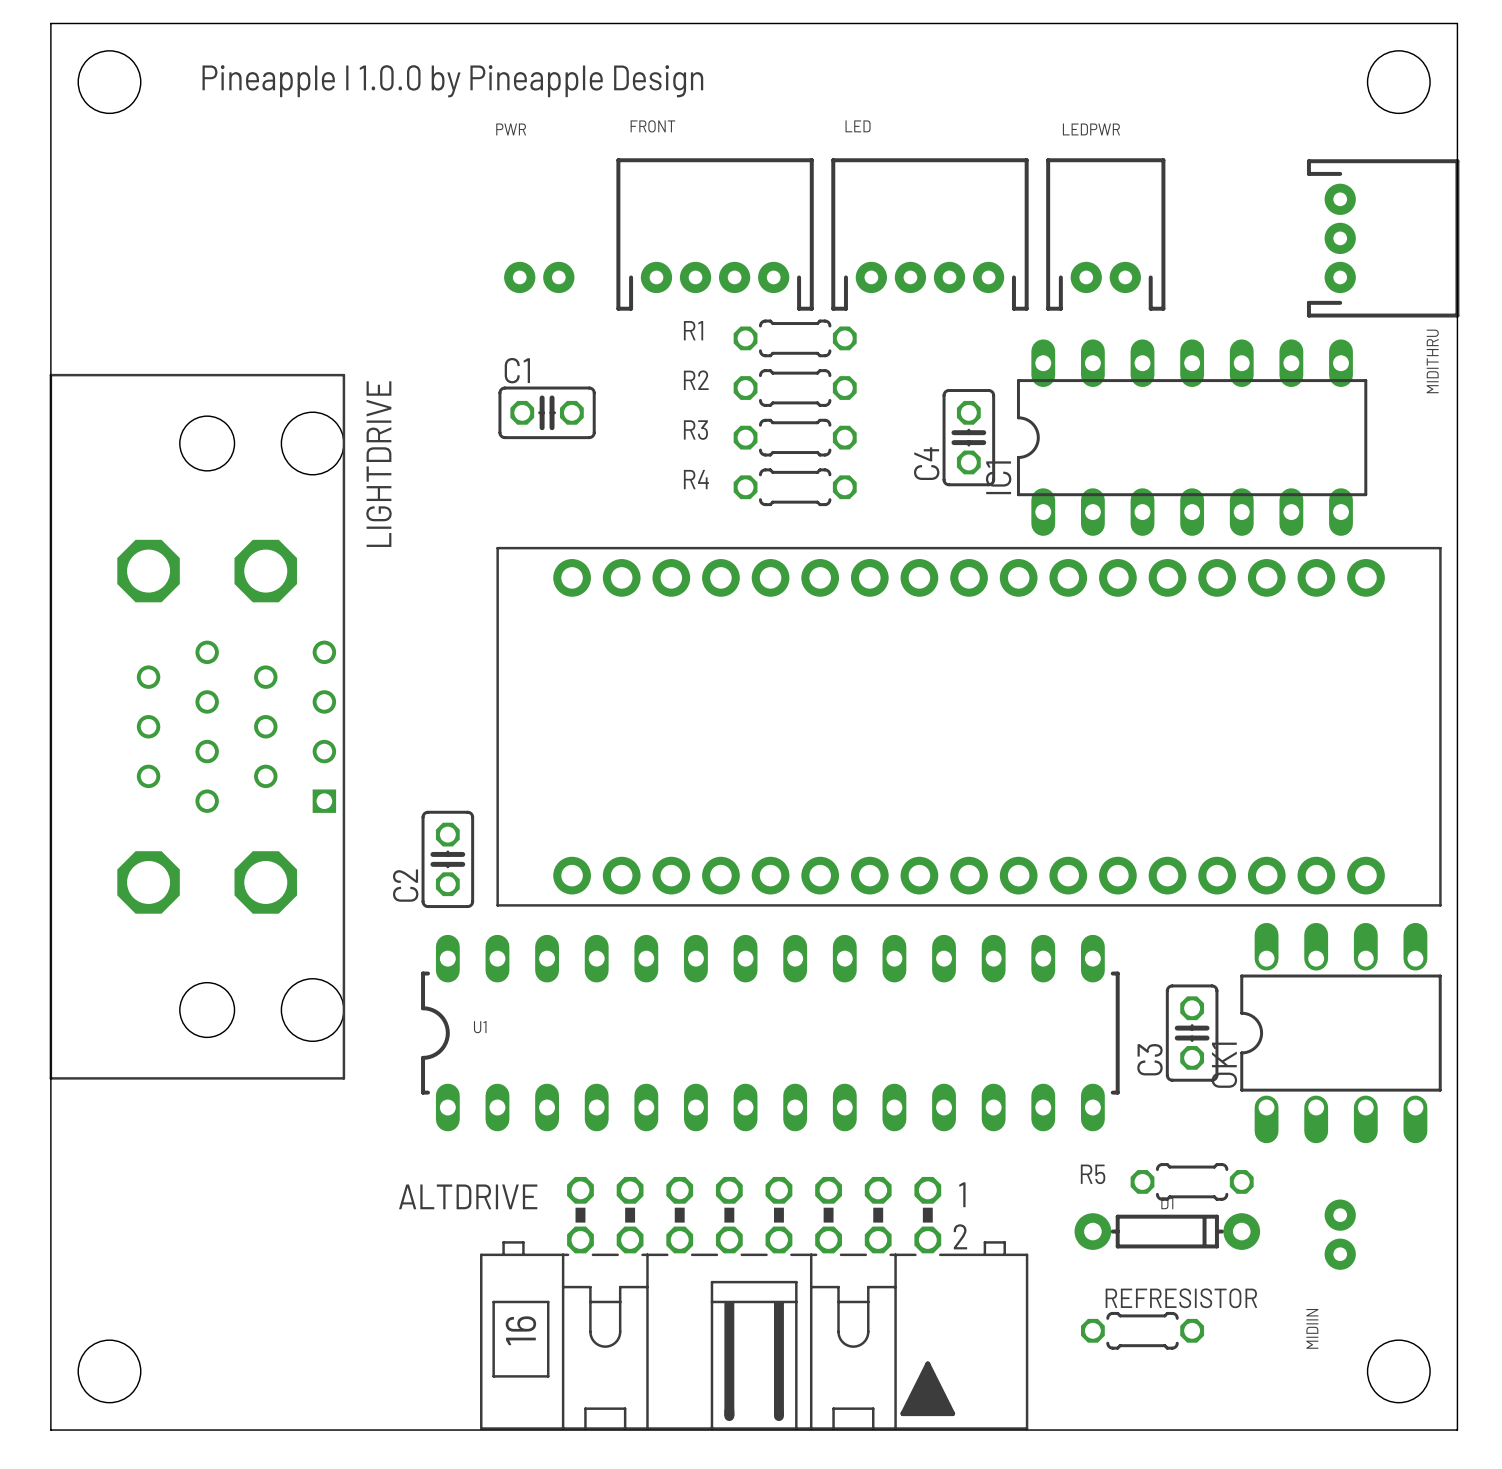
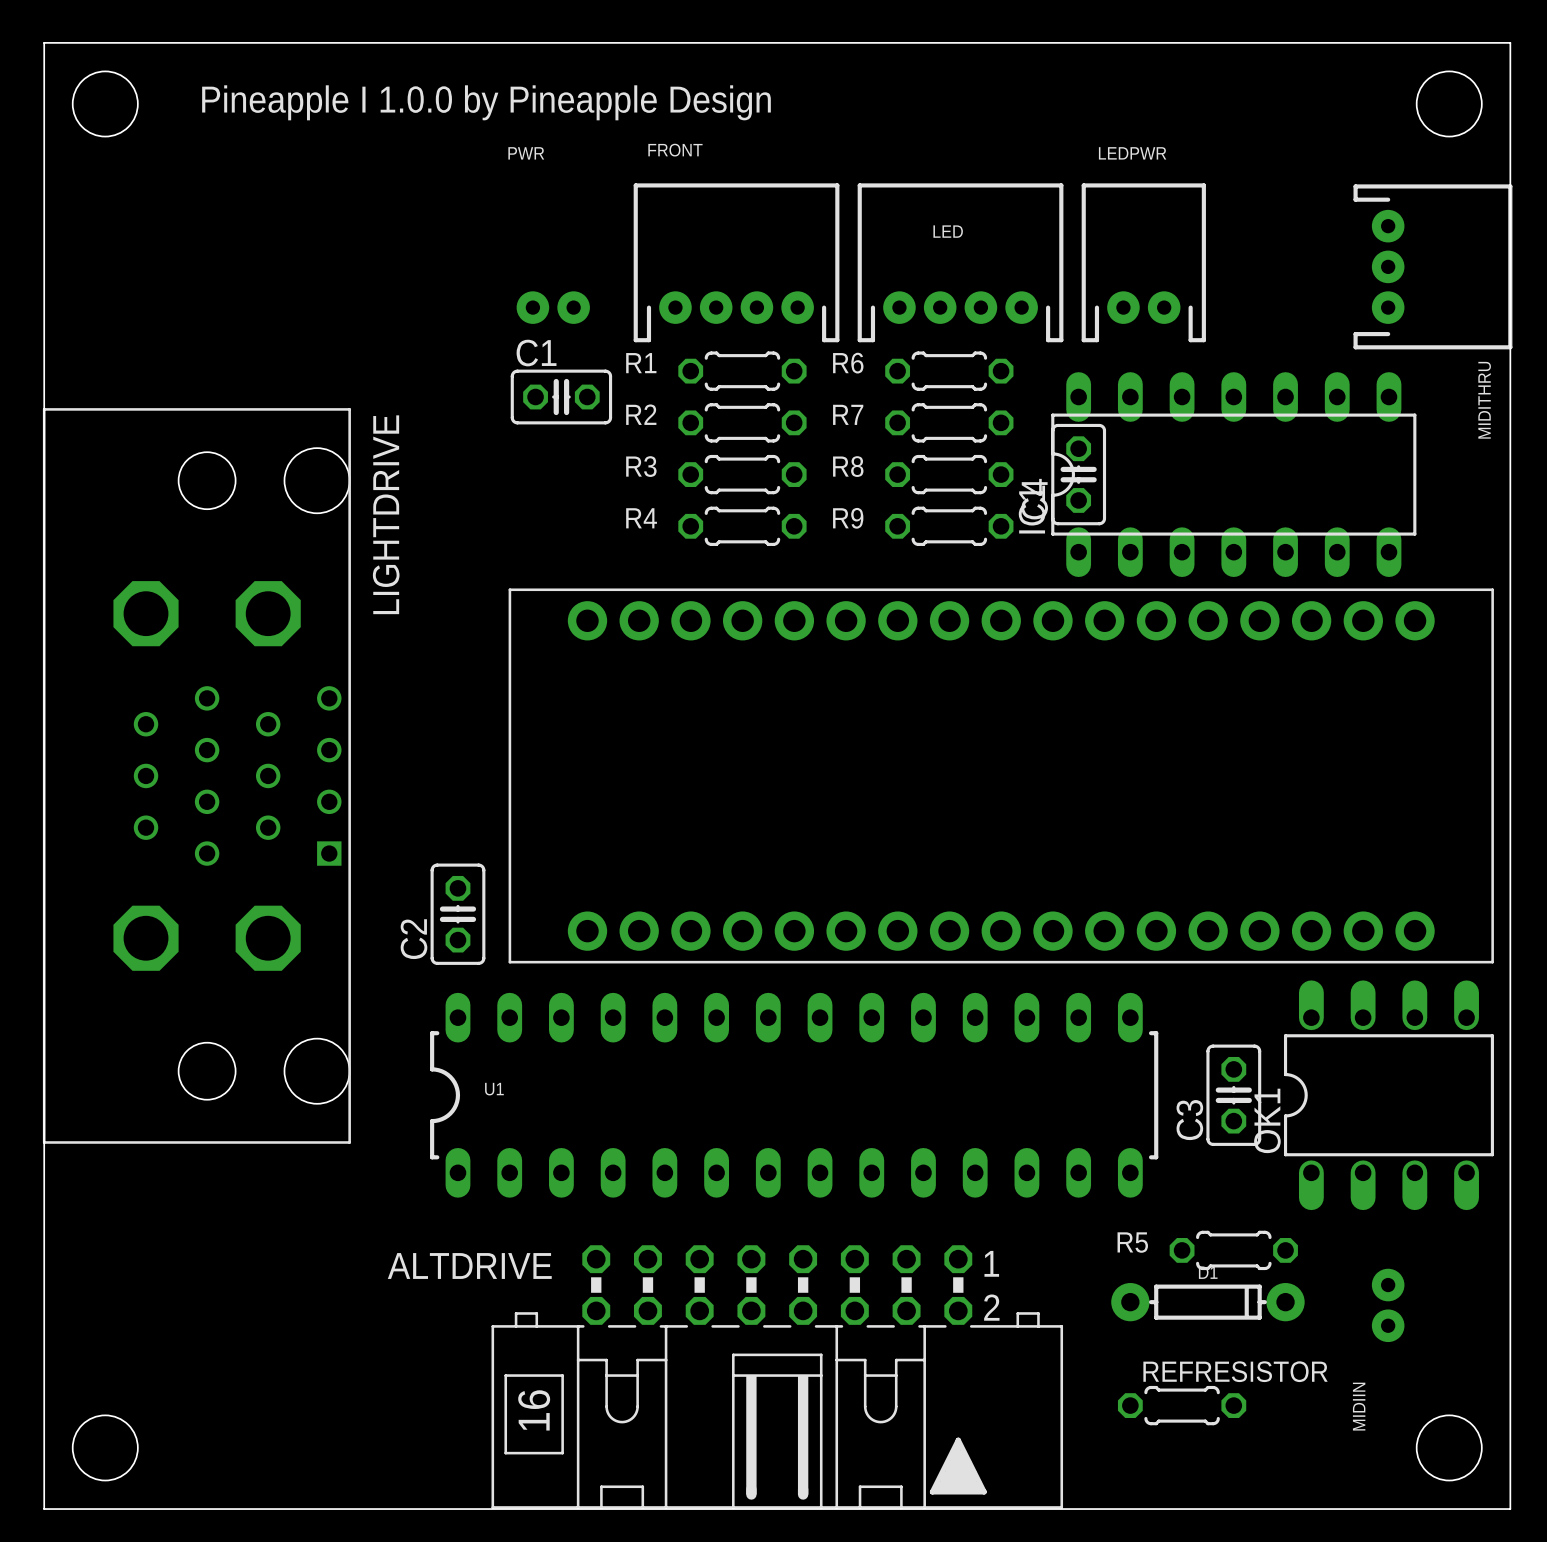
LED name position: LED (858, 126) -> LED (948, 231)
R1 position: (795, 338) -> (742, 371)
R6: none -> (949, 371)
R2 position: (795, 388) -> (742, 422)
R7: none -> (949, 422)
C1 position: (547, 412) -> (561, 397)
R3 position: (795, 437) -> (742, 474)
R8: none -> (949, 474)
C4 position: (968, 437) -> (1078, 474)
R4 position: (795, 487) -> (742, 526)
R9: none -> (949, 526)

